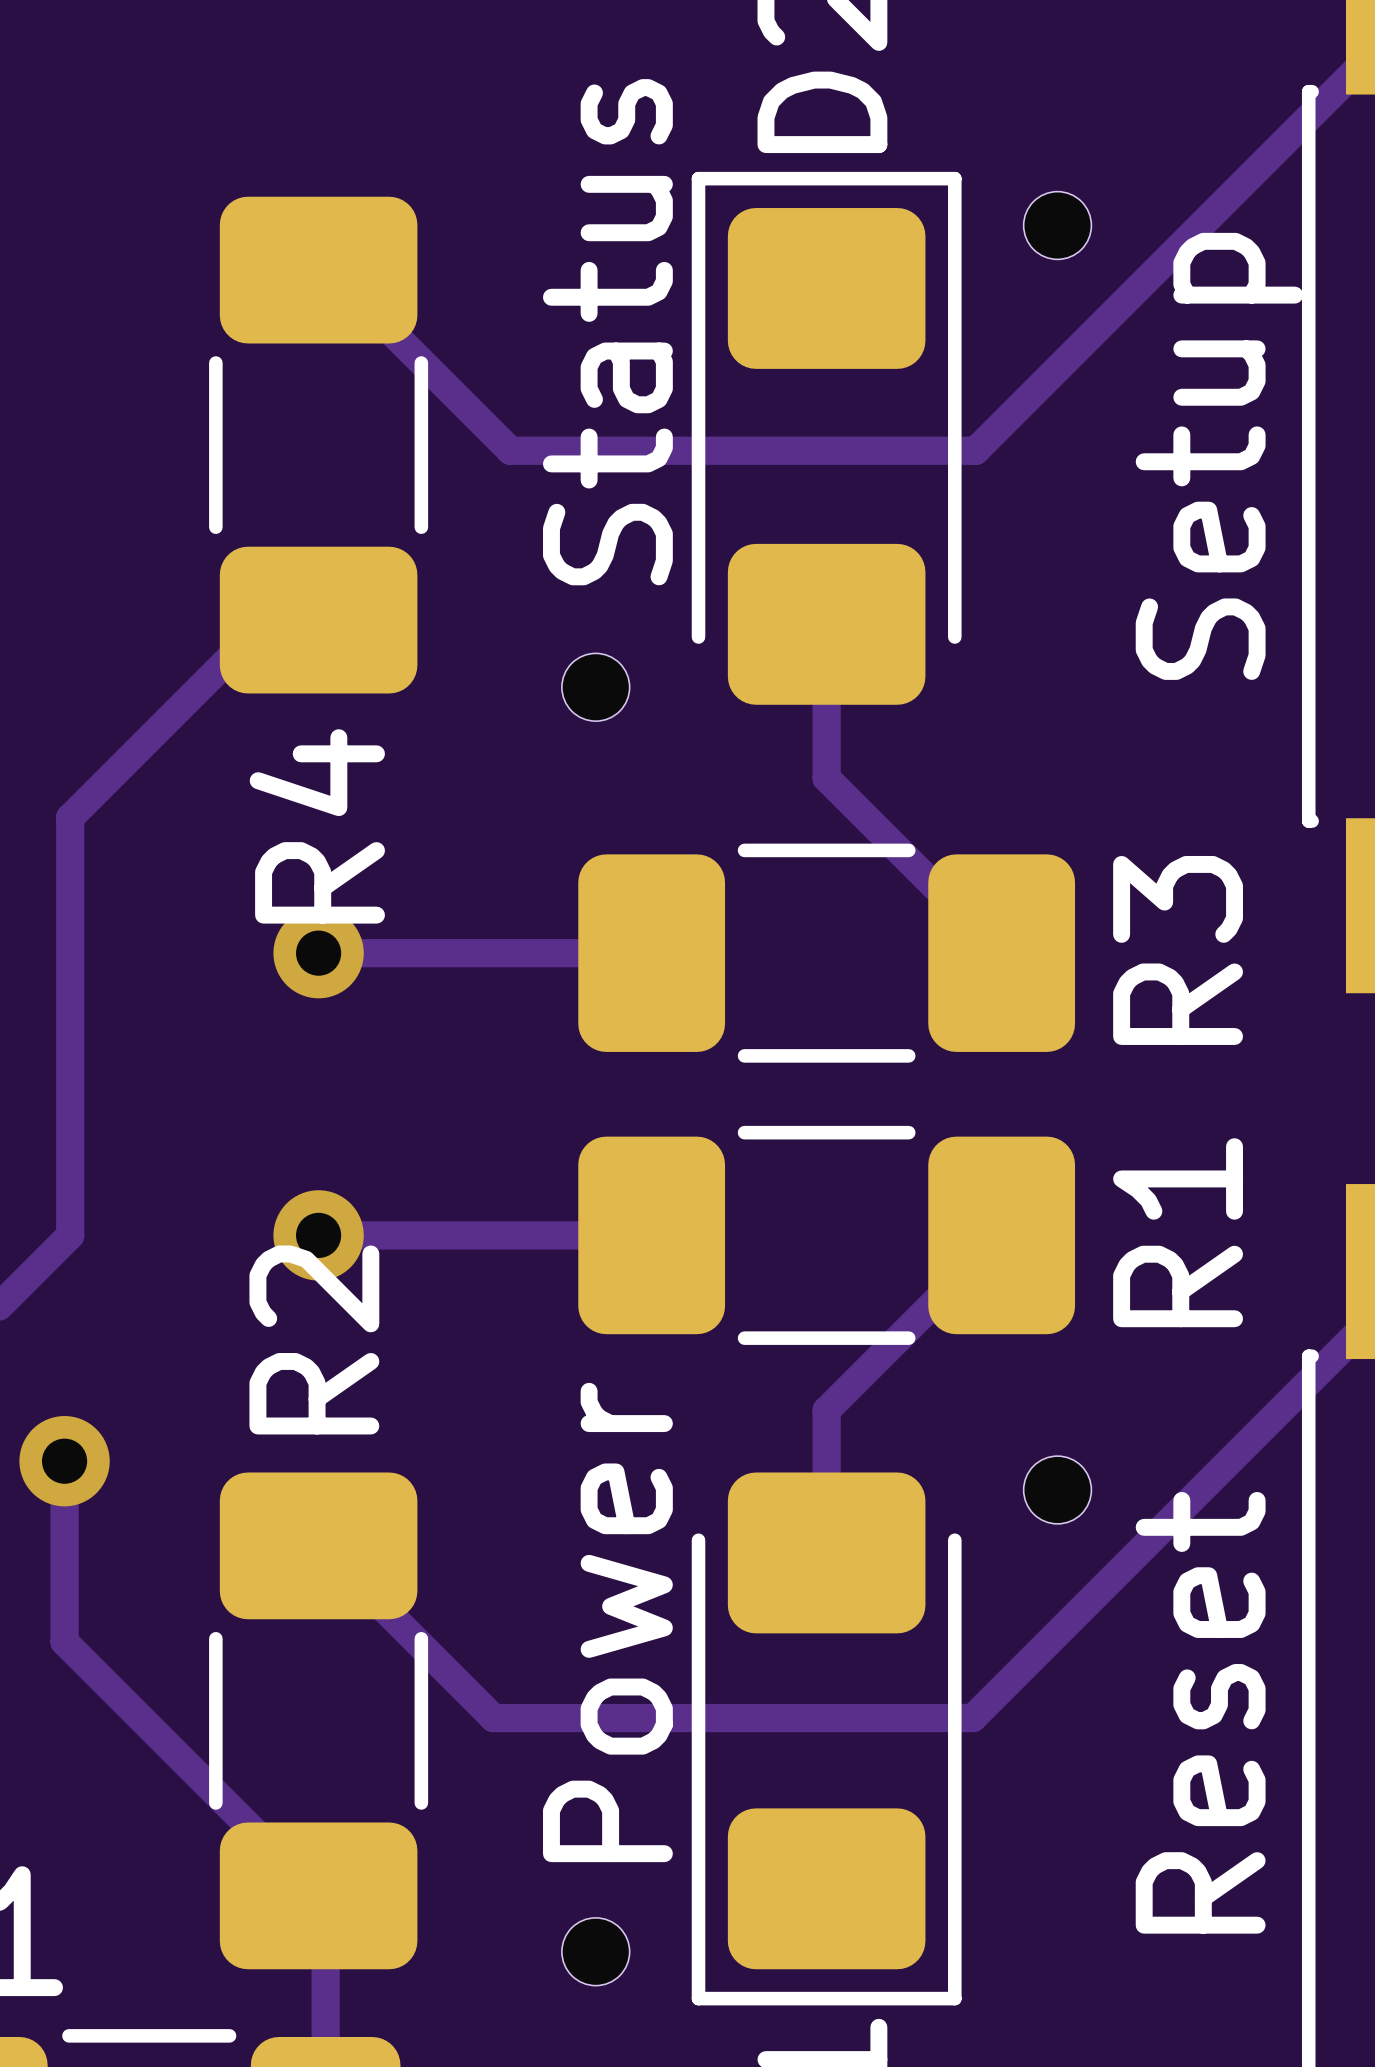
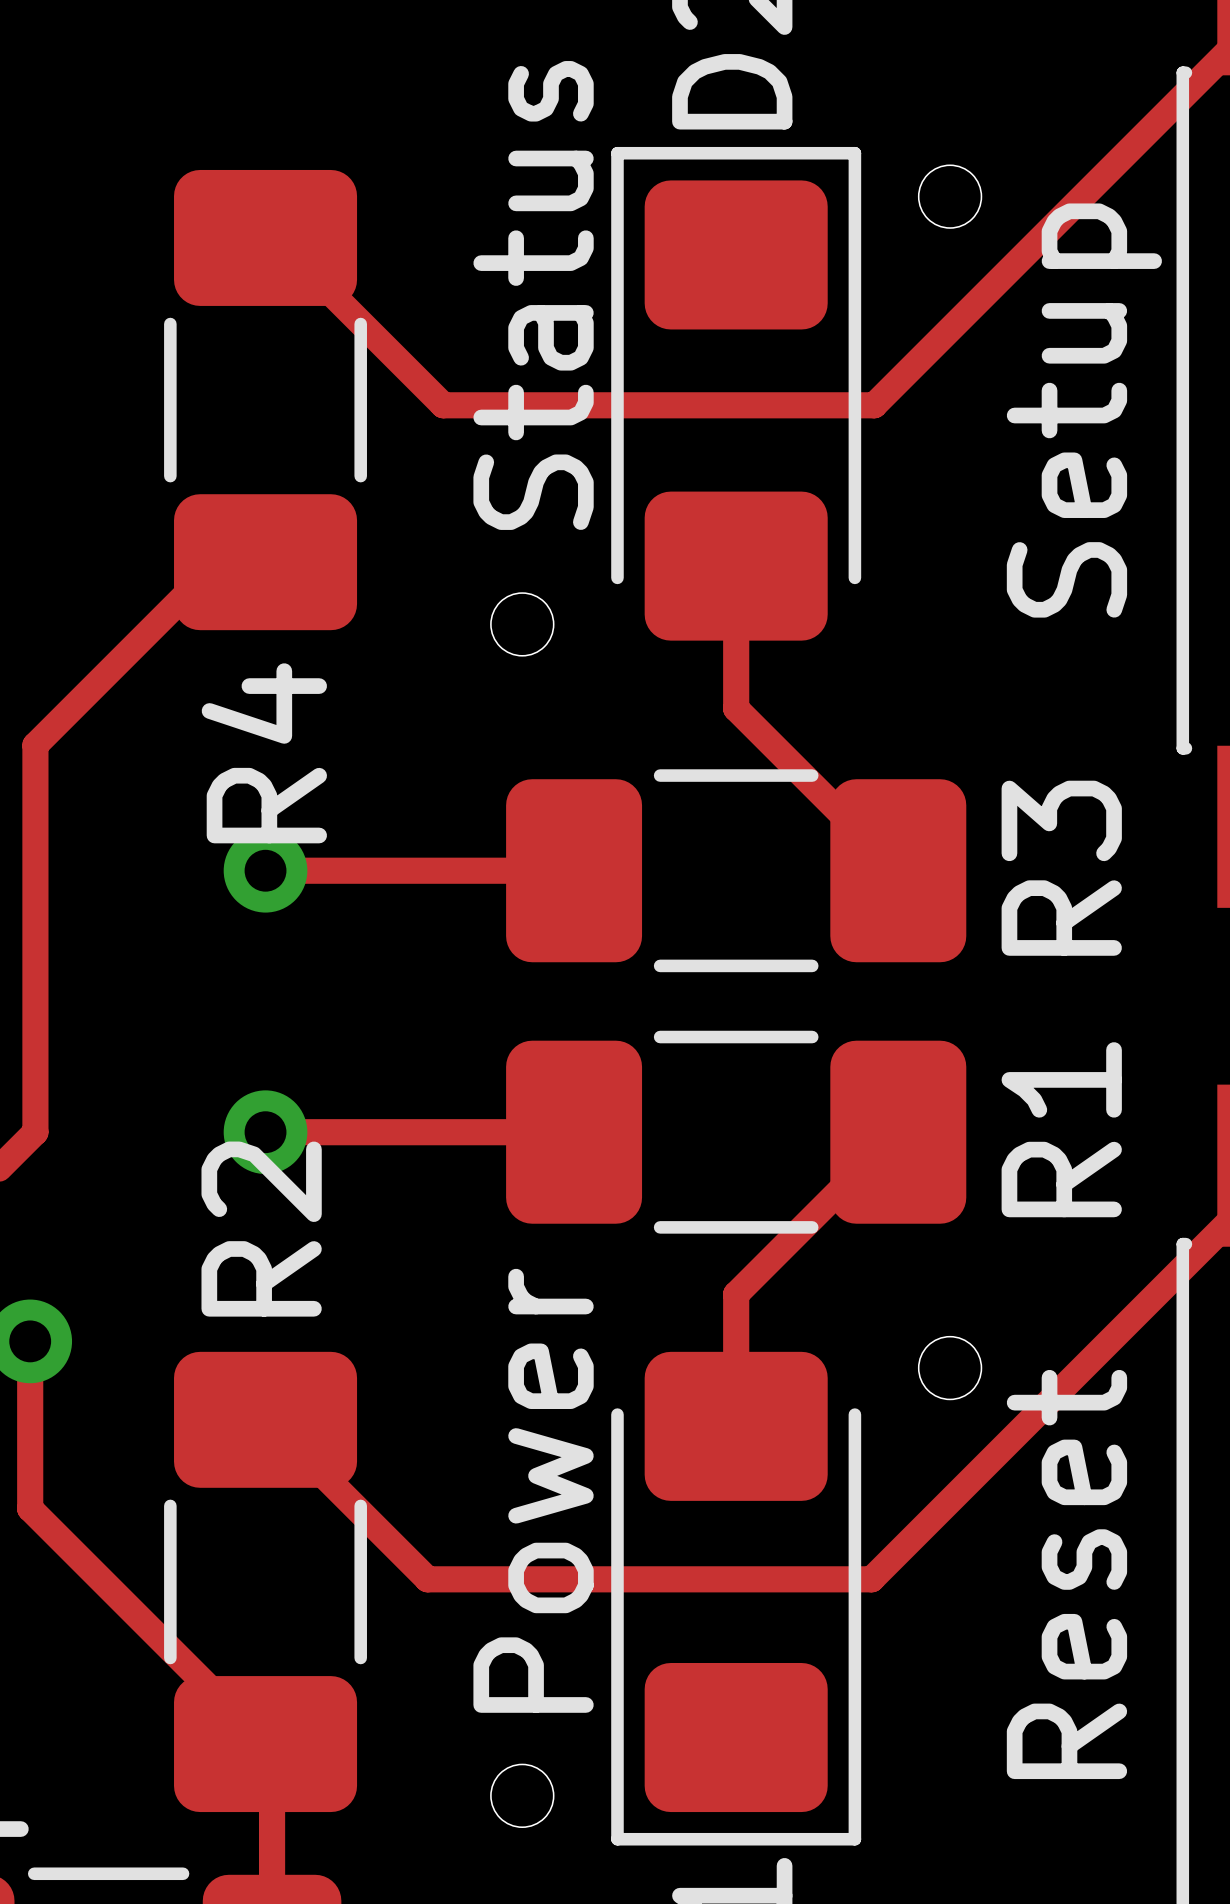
part value position: Setup (1219, 456) -> Setup (1084, 410)
part value position: Reset (1200, 1712) -> Reset (1066, 1574)

